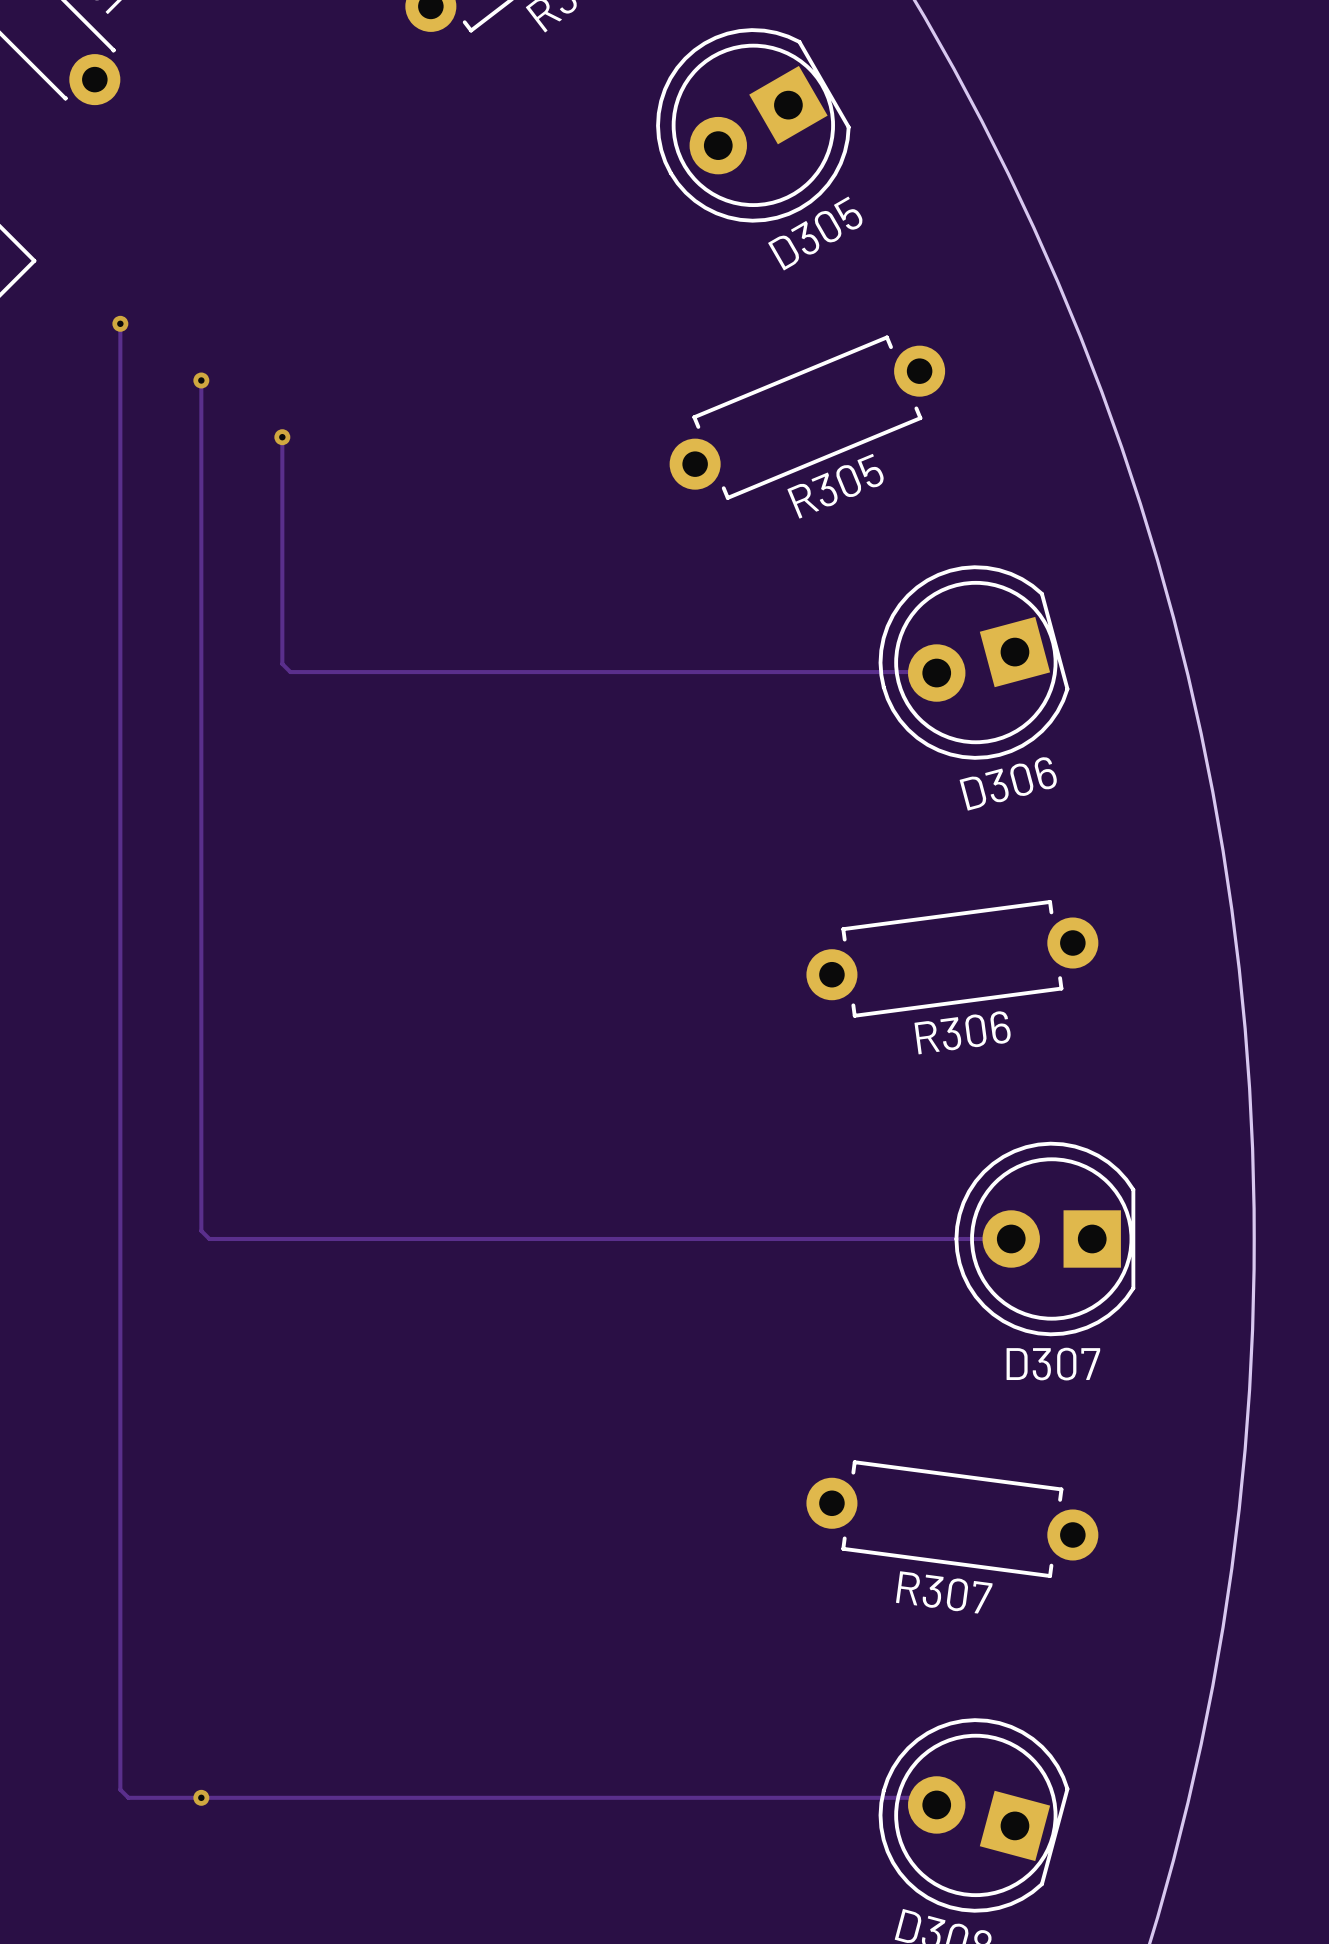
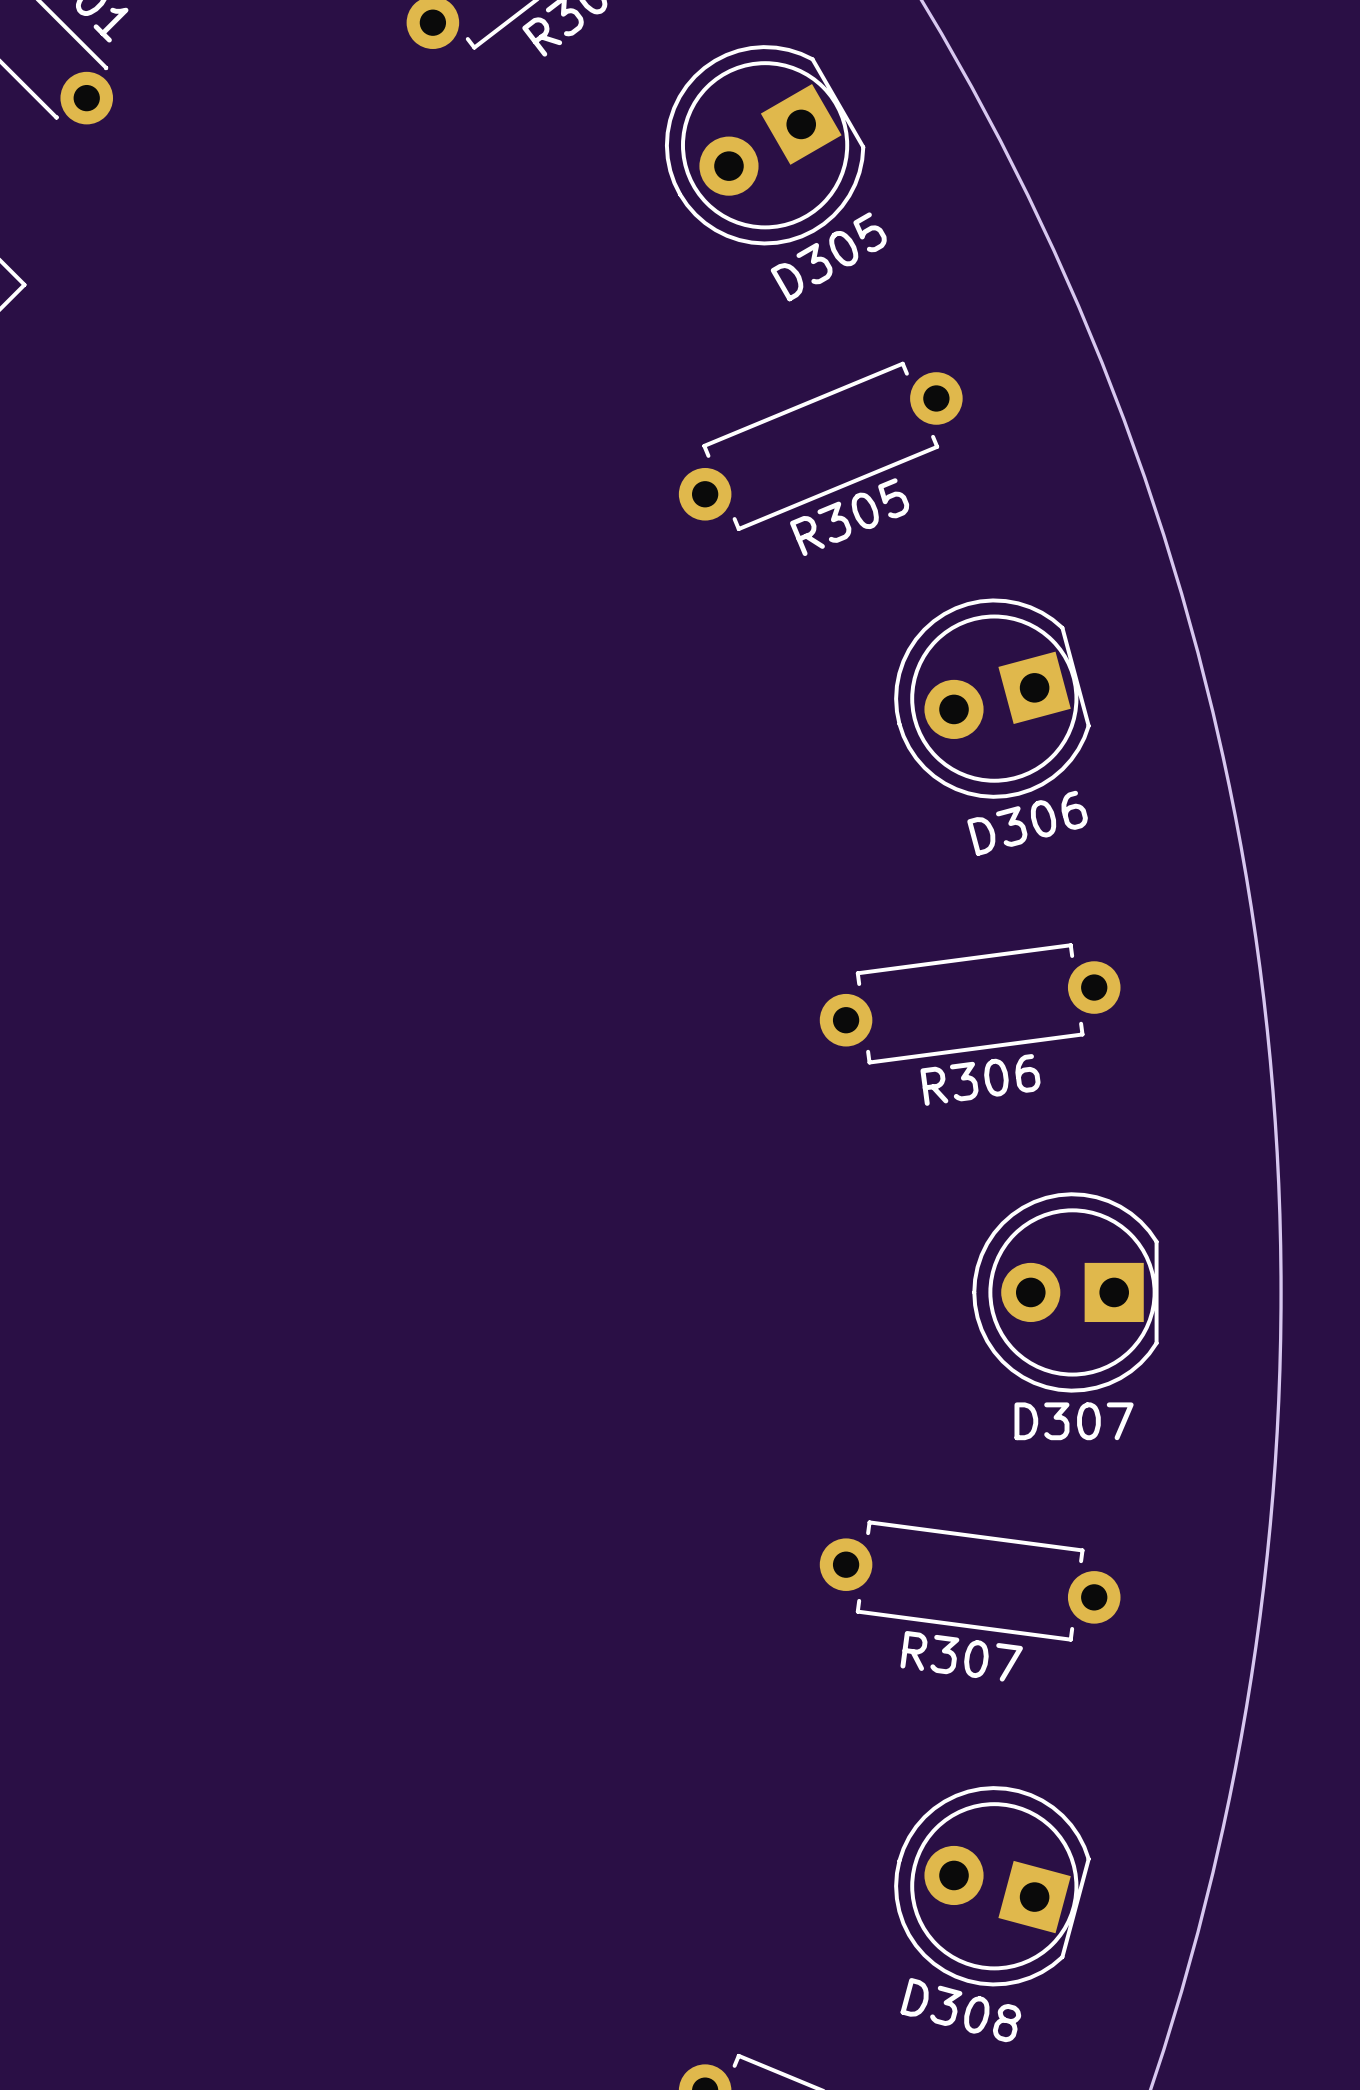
track: (120, 323) (120, 1789) (128, 1797) (929, 1797) (936, 1804) -> none
via: (120, 323) -> none
track: (201, 380) (201, 1230) (209, 1238) (1011, 1238) -> none
via: (201, 380) -> none
track: (282, 437) (282, 663) (290, 672) (936, 673) -> none
via: (282, 437) -> none
via: (201, 1797) -> none

